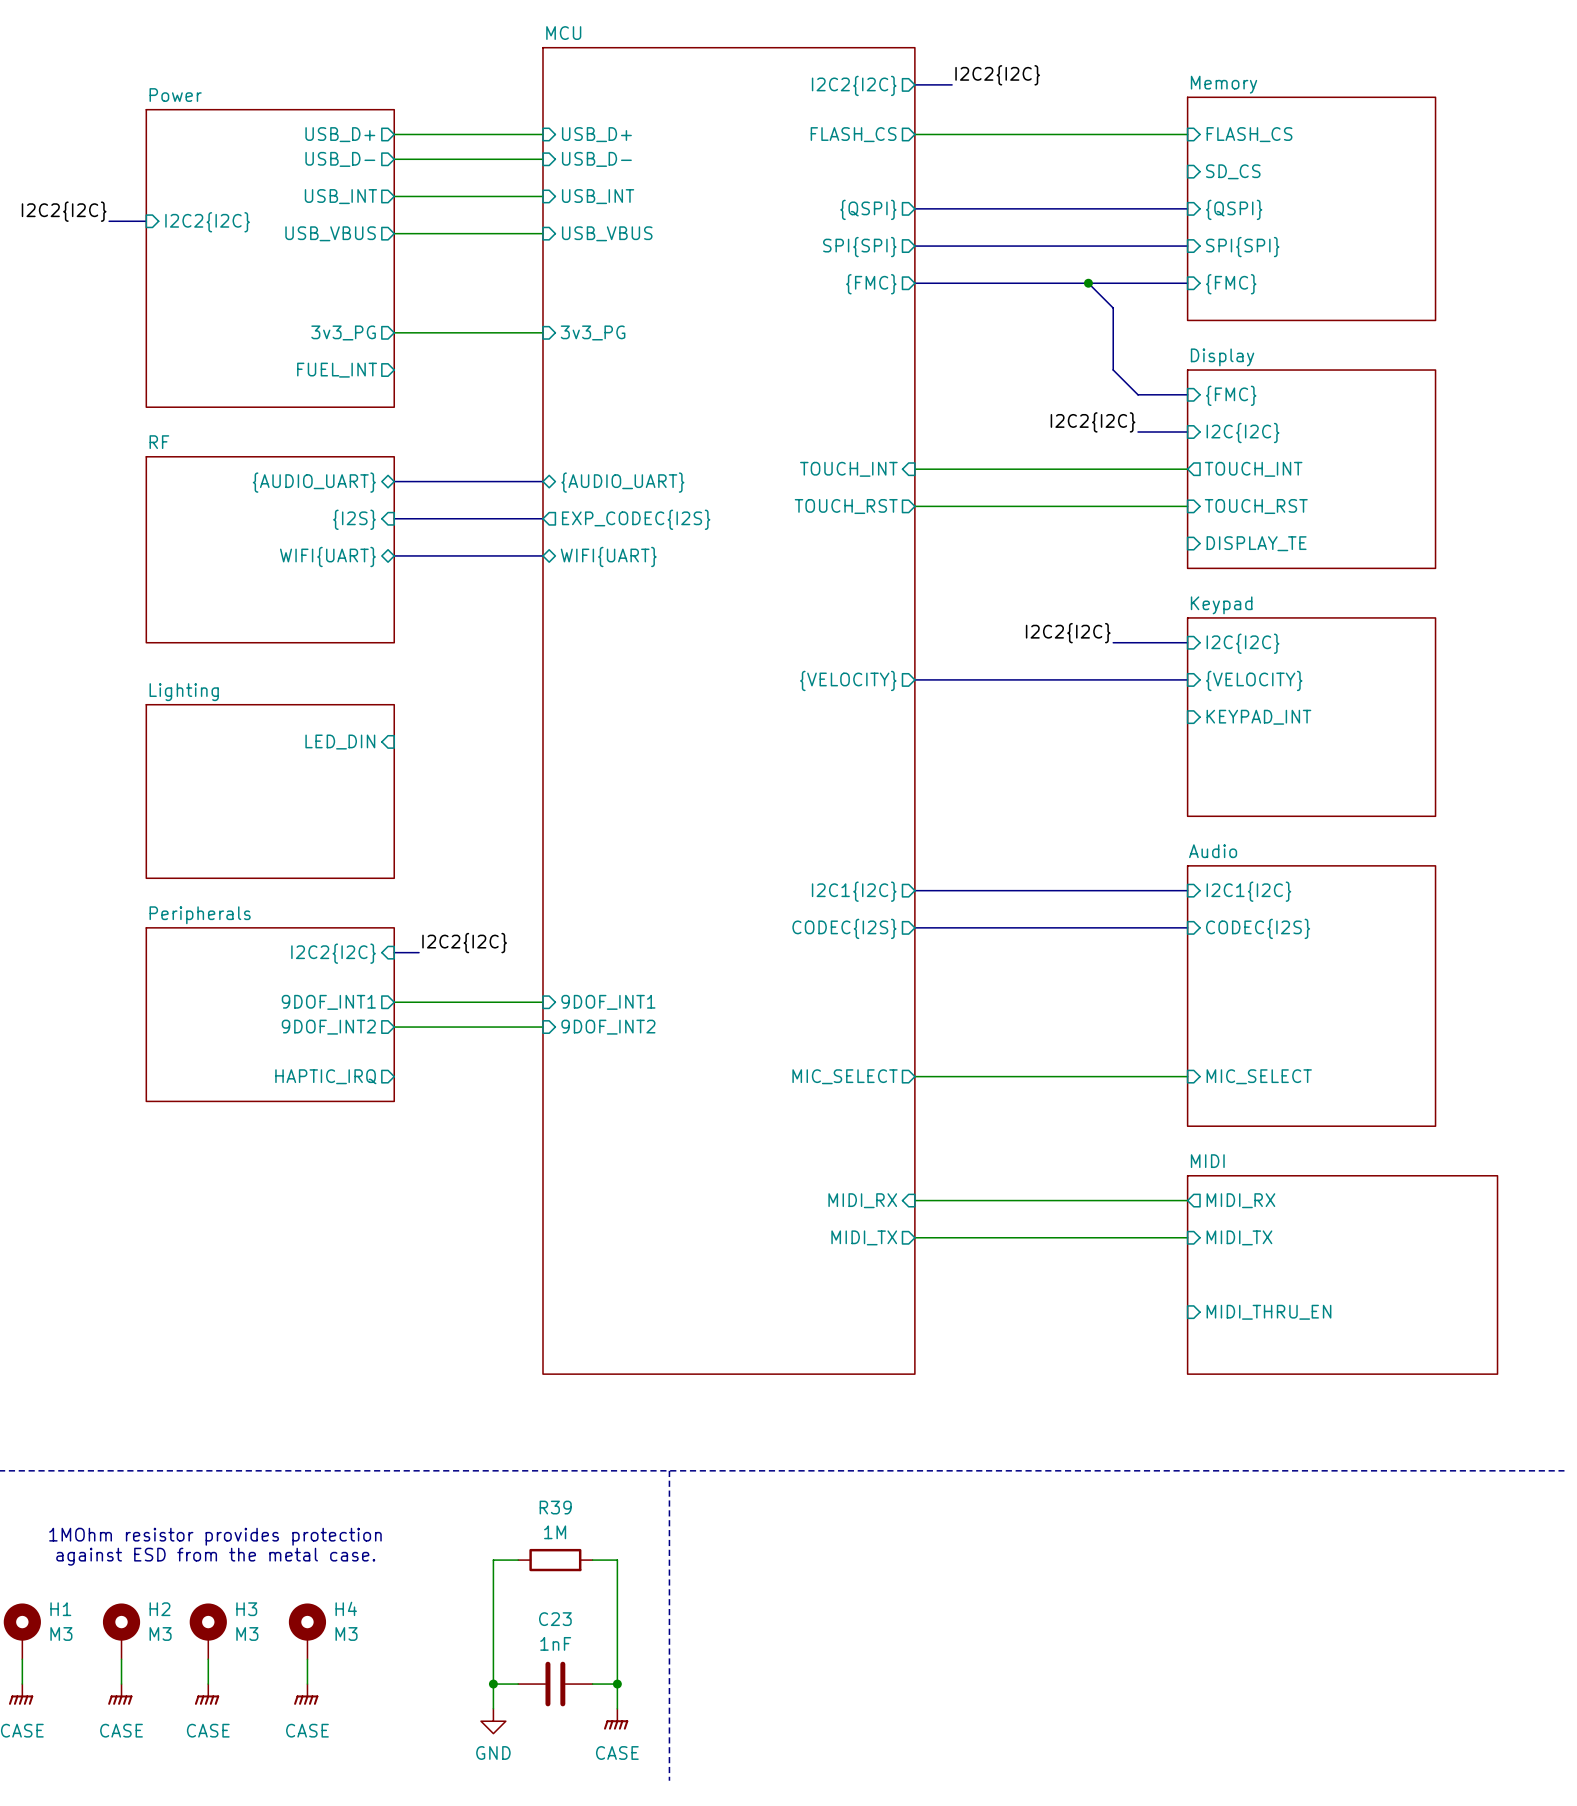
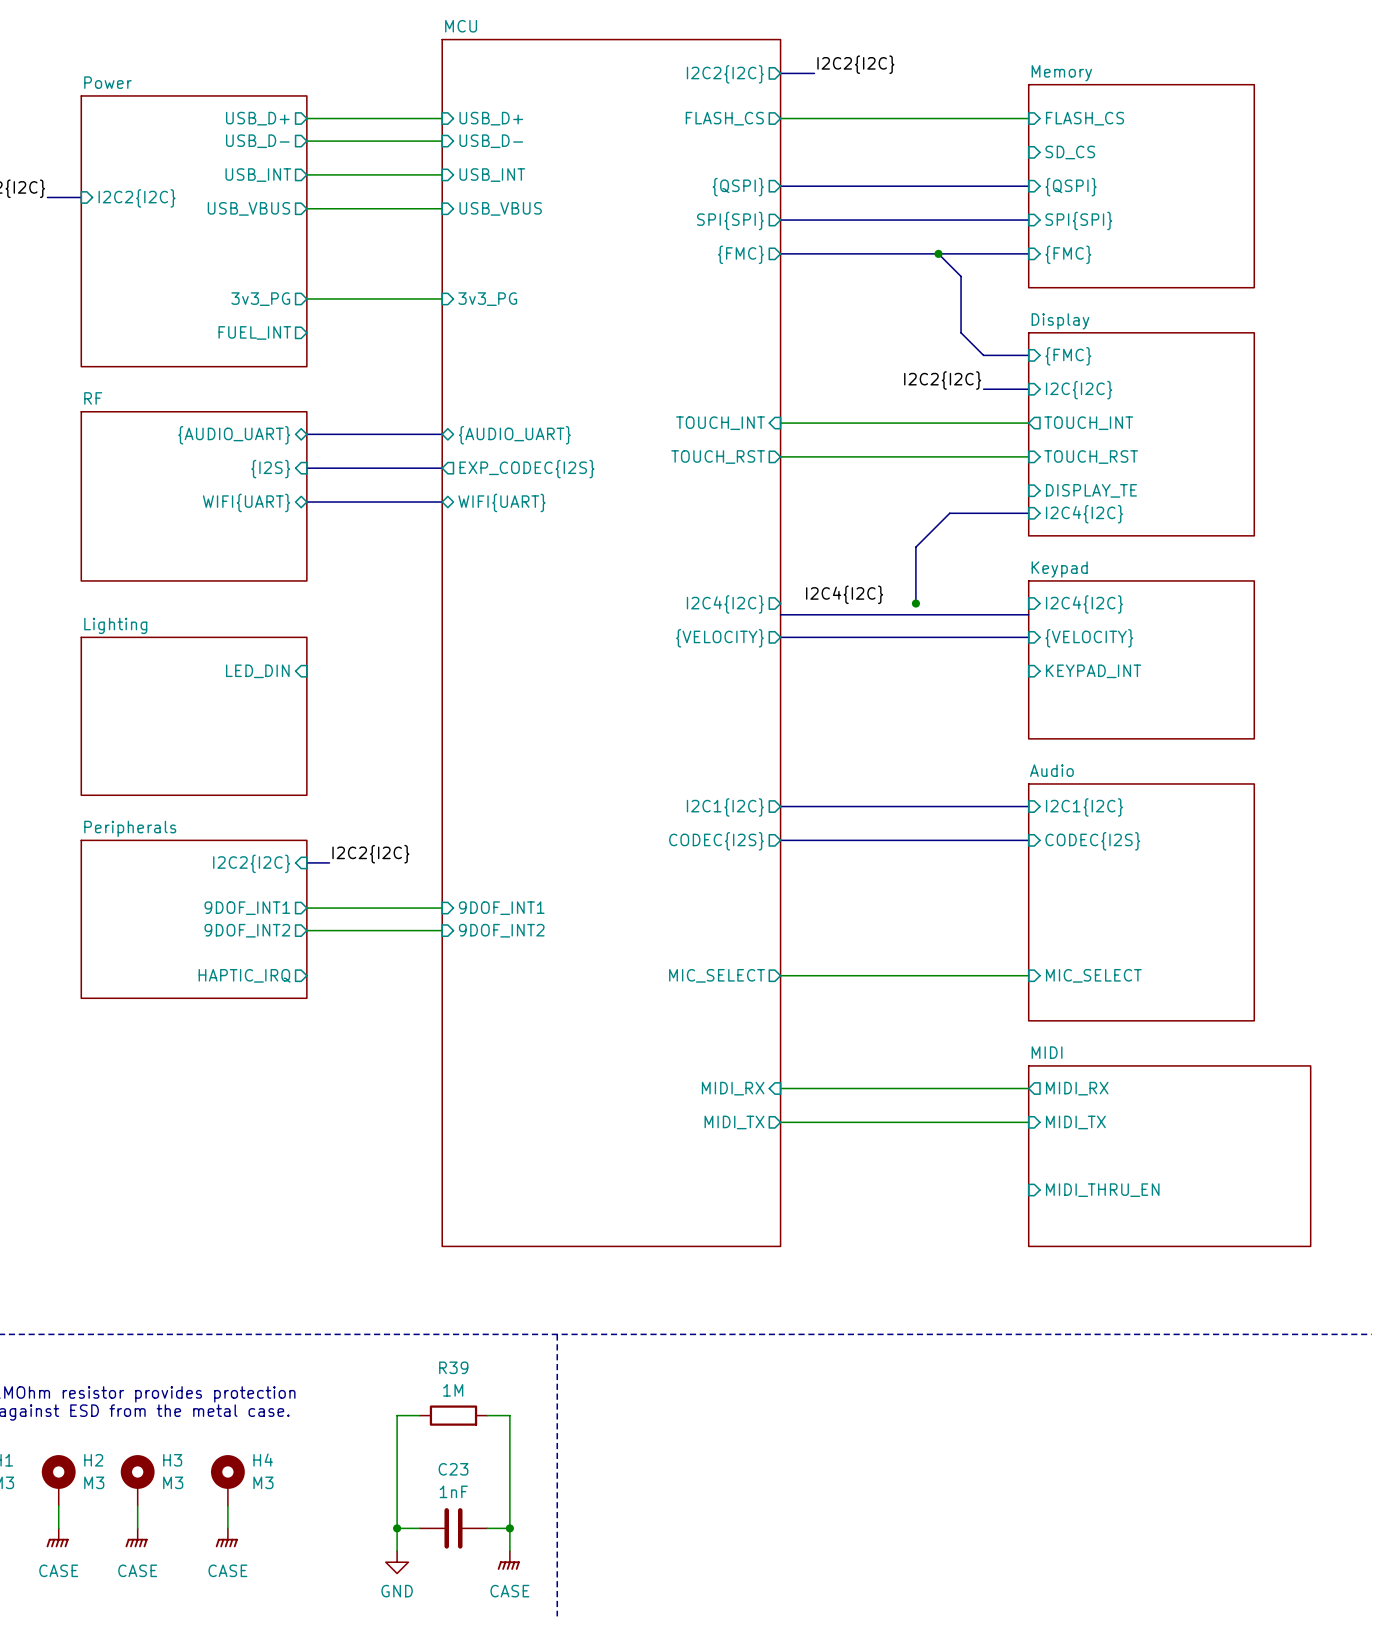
sheet Display: (1311, 469) -> none
sheet Display: none -> (1141, 434)
bus: none -> (1028, 513) (949, 513) (915, 547) (915, 603)
sheet pin: none -> I2C4{I2C} (1084, 514)
label: I2C2{I2C} (1068, 633) -> I2C4{I2C} (844, 594)
bus: (1113, 642) (1187, 642) -> none
sheet pin: I2C{I2C} (1243, 643) -> I2C4{I2C} (1084, 604)
junction: none -> (915, 603)
sheet pin: none -> I2C4{I2C} (725, 604)
sheet pin position: {VELOCITY} (848, 680) -> {VELOCITY} (719, 638)
sheet pin position: {VELOCITY} (1254, 680) -> {VELOCITY} (1089, 638)
bus: none -> (780, 637) (1028, 637)
sheet pin position: KEYPAD_INT (1258, 717) -> KEYPAD_INT (1093, 671)
sheet Keypad: (1311, 717) -> none
sheet Keypad: none -> (1141, 659)

